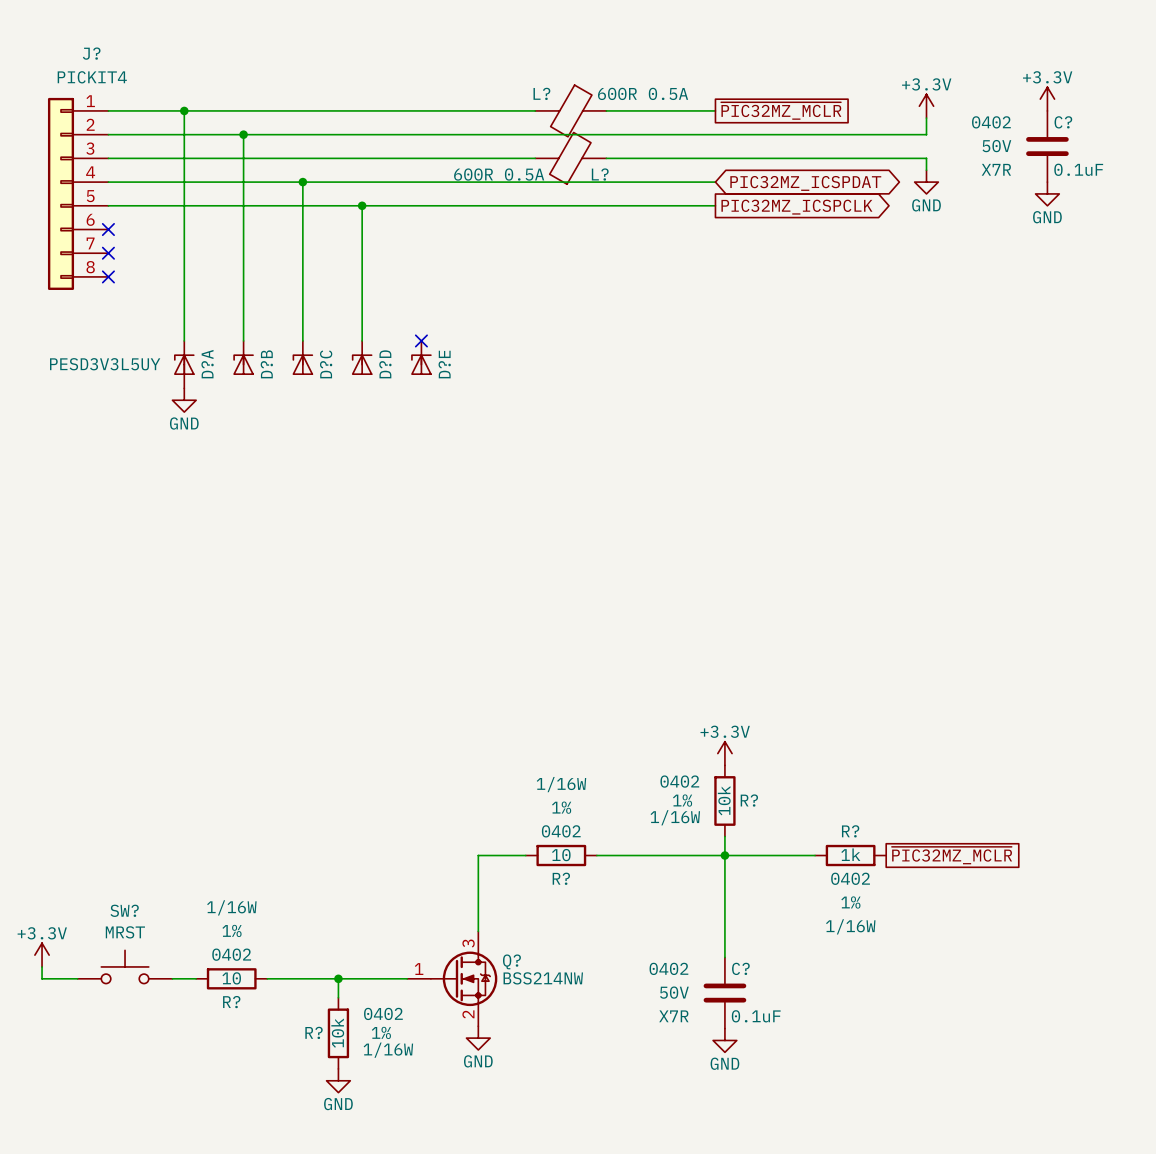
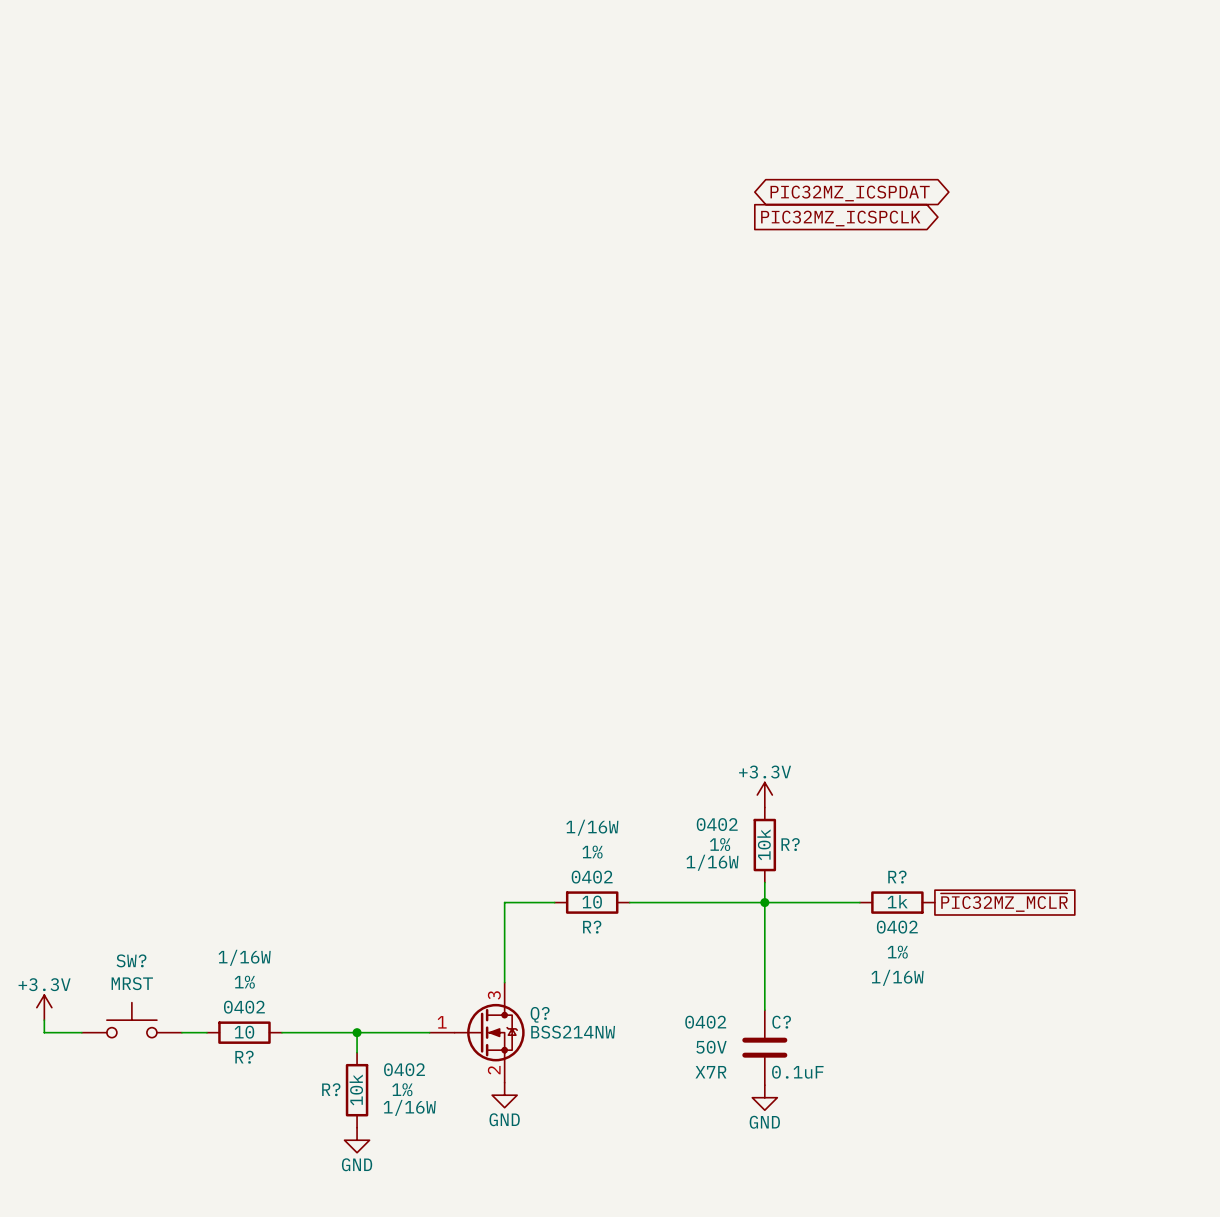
power symbol: +3.3V (1047, 99) -> none
power symbol: +3.3V (926, 106) -> none
wire: (108, 110) (535, 110) -> none
wire: (184, 110) (184, 340) -> none
junction: (184, 110) -> none
L?: 600R 0.5A (570, 110) -> none
wire: (606, 110) (715, 110) -> none
global label: ~{PIC32MZ_MCLR} (781, 111) -> none
wire: (926, 118) (926, 134) (108, 134) -> none
wire: (243, 134) (243, 340) -> none
junction: (243, 134) -> none
C?: 0.1uF (1047, 146) -> none
wire: (108, 158) (535, 158) -> none
L?: 600R 0.5A (570, 158) -> none
wire: (606, 158) (926, 158) (926, 170) -> none
wire: (108, 182) (715, 182) -> none
wire: (302, 182) (302, 340) -> none
junction: (302, 182) -> none
power symbol: GND (926, 182) -> none
J?: PICKIT4 (78, 193) -> none
power symbol: GND (1047, 193) -> none
wire: (108, 205) (715, 205) -> none
wire: (362, 205) (362, 340) -> none
junction: (362, 205) -> none
no-connect mark: (108, 229) -> none
no-connect mark: (108, 253) -> none
no-connect mark: (108, 276) -> none
no-connect mark: (421, 340) -> none
D?B: (243, 357) -> none
D?C: (302, 357) -> none
D?D: (362, 357) -> none
D?E: (421, 357) -> none
D?A: PESD3V3L5UY (184, 364) -> none
power symbol: GND (184, 400) -> none

